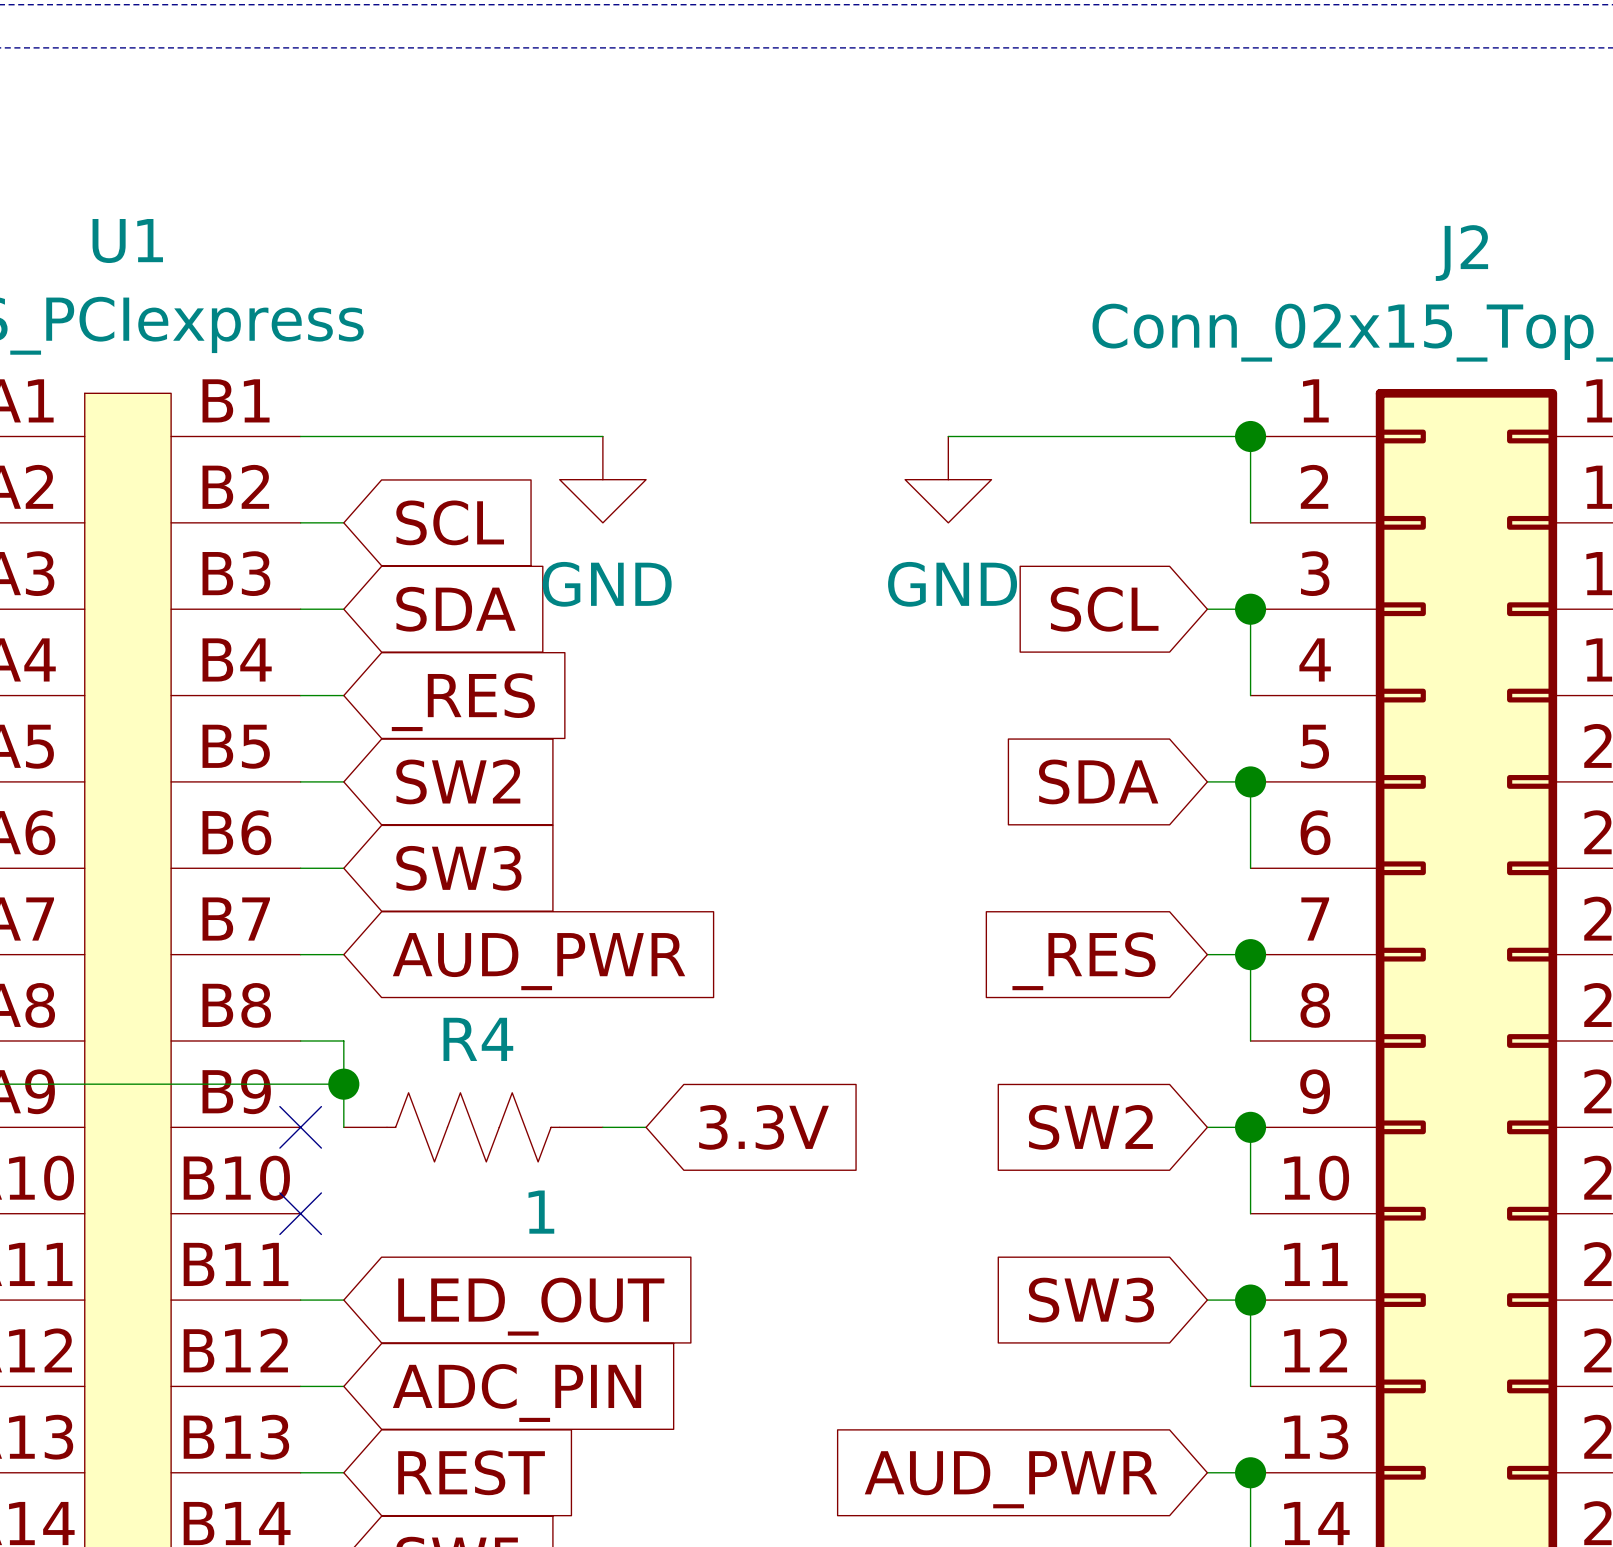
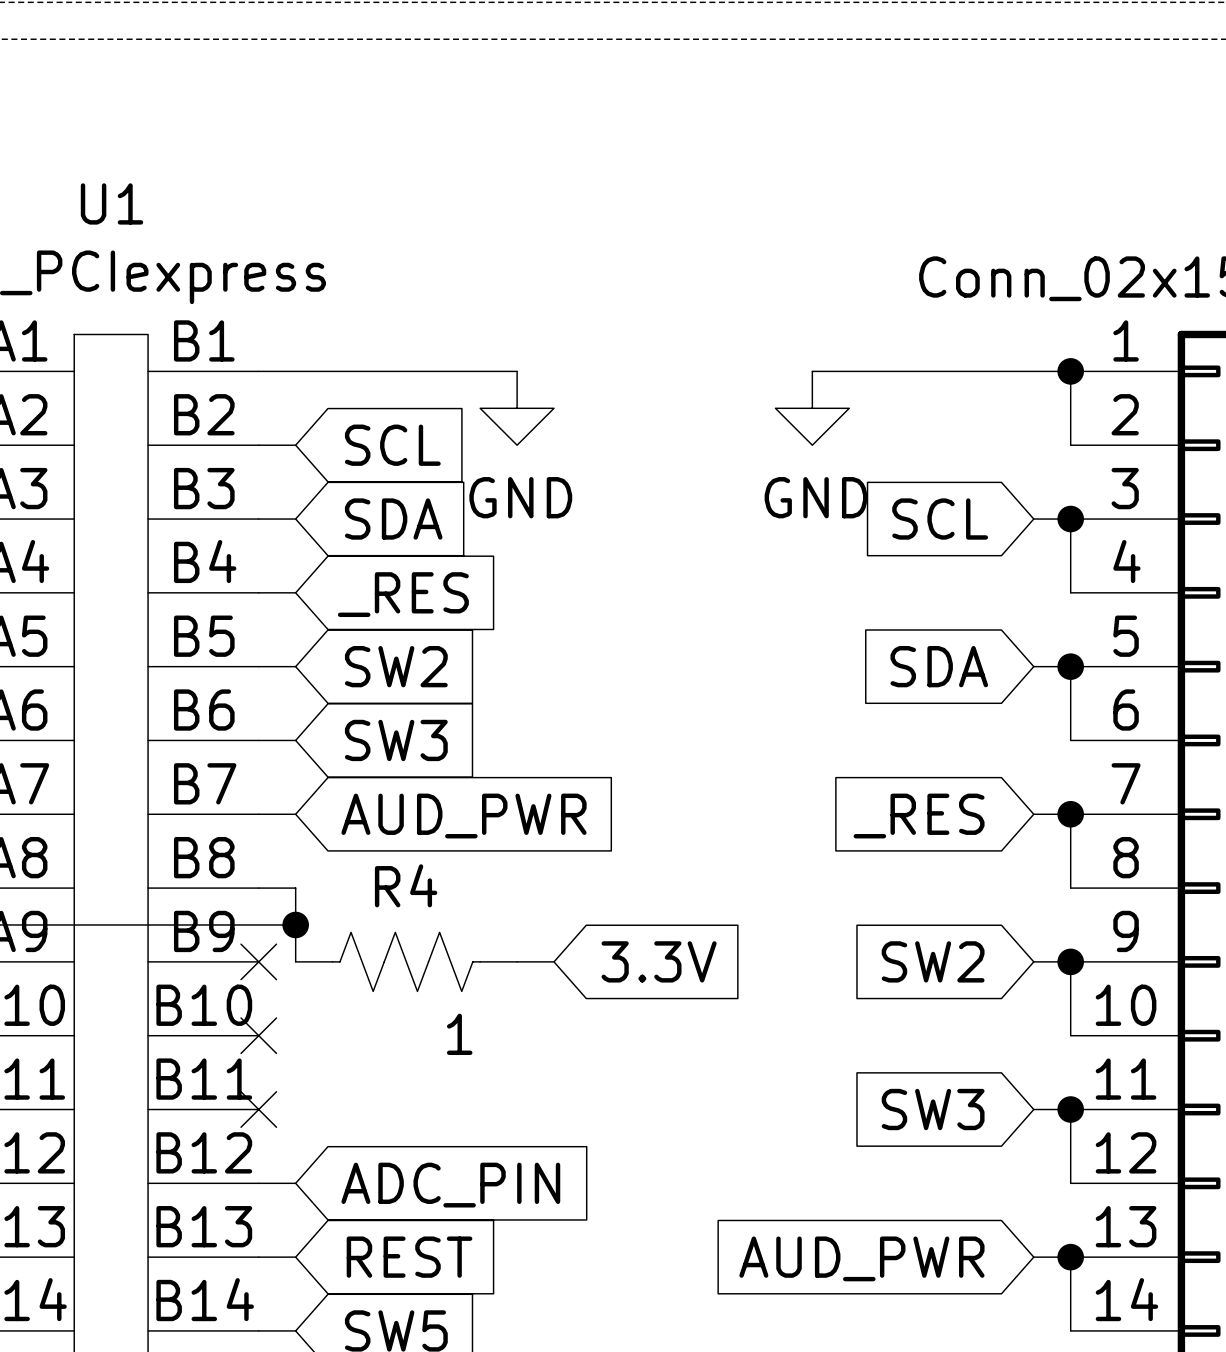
wire: (300, 1300) (343, 1300) -> none
no-connect mark: none -> (258, 1109)
global label: LED_OUT (531, 1306) -> none

